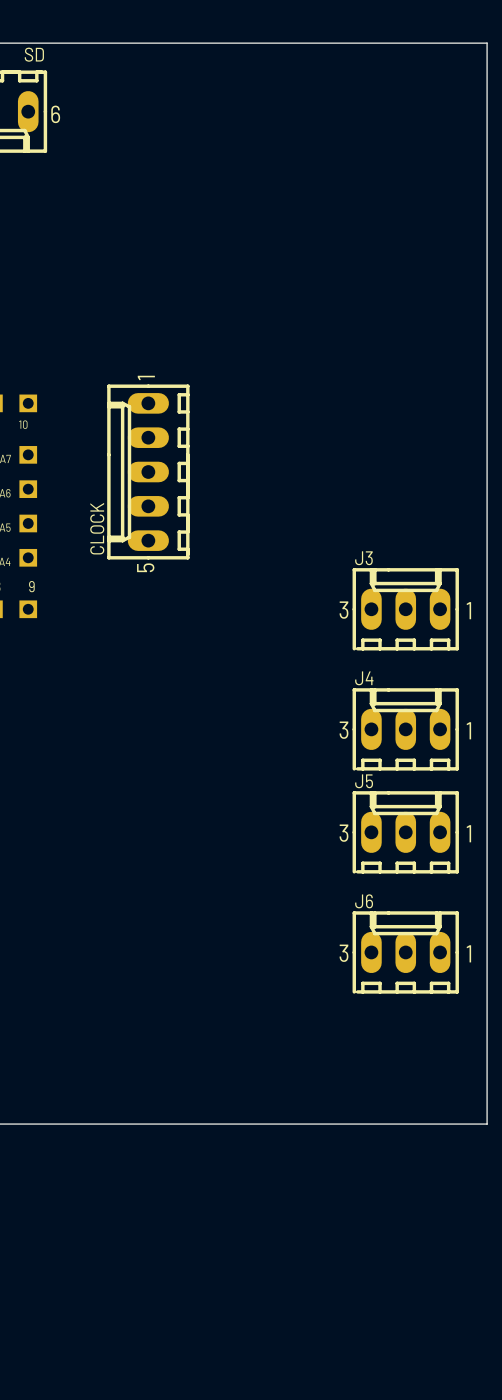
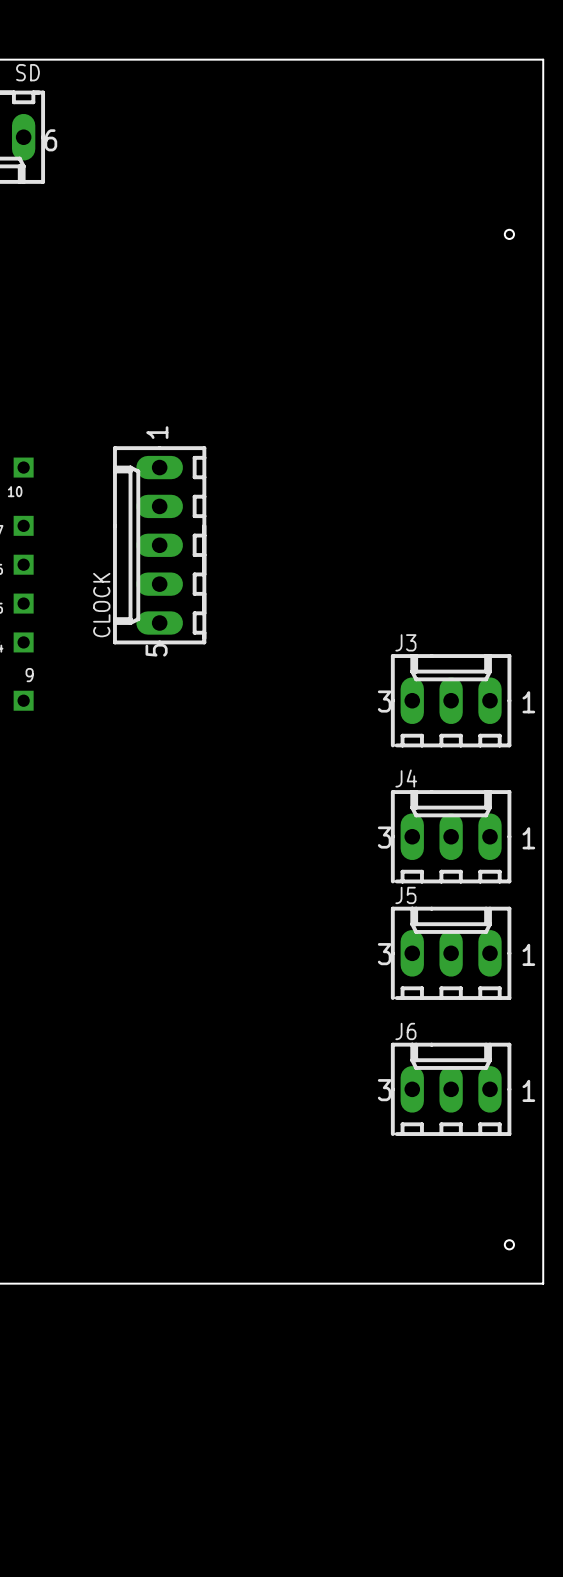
hole: none -> (509, 234)
hole: none -> (509, 1244)

